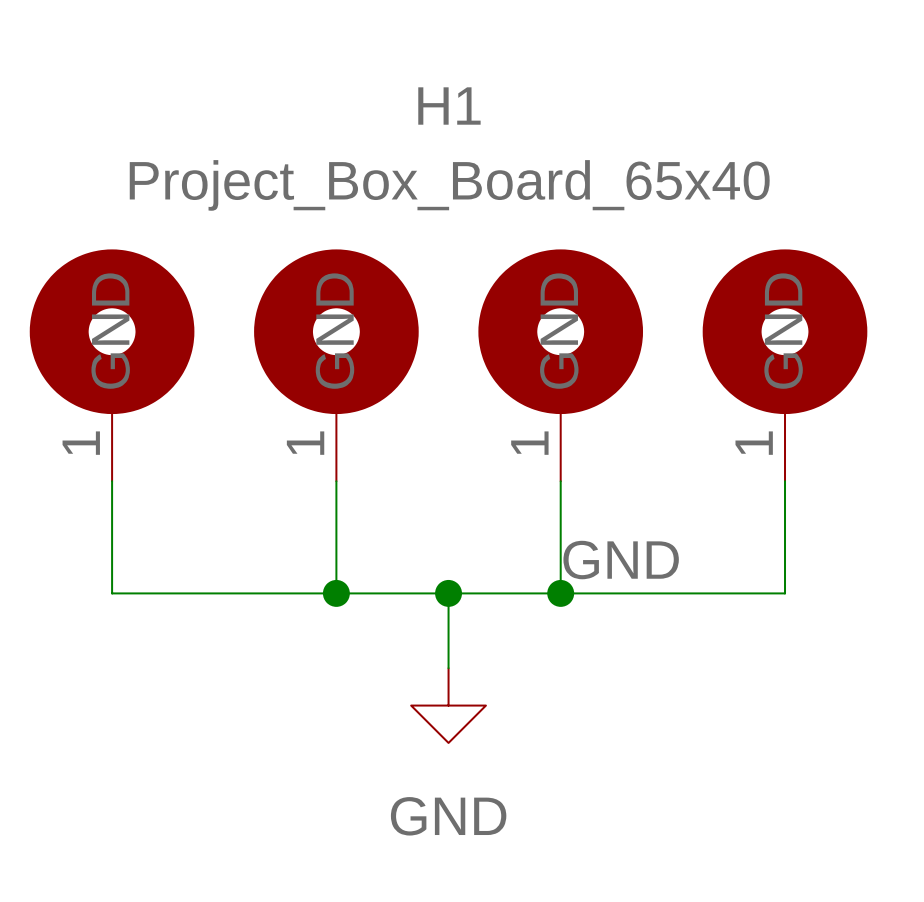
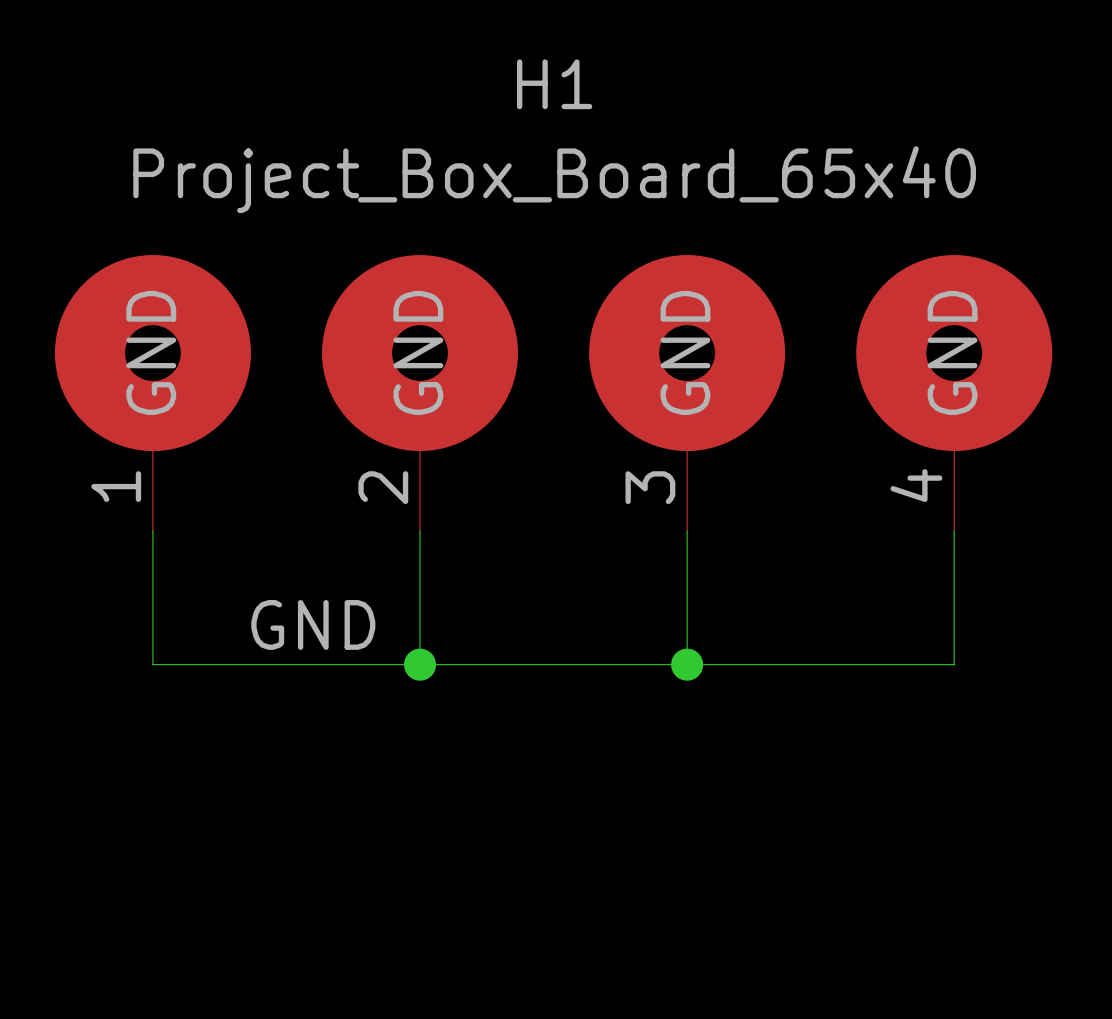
H1 pin number: 1 (305, 443) -> 2 (383, 487)
H1 pin number: 1 (529, 443) -> 3 (650, 487)
H1 pin number: 1 (754, 443) -> 4 (916, 485)
label position: GND (621, 560) -> GND (313, 624)
wire: (448, 593) (448, 668) -> none
junction: (448, 593) -> none
power symbol: GND (448, 705) -> none

